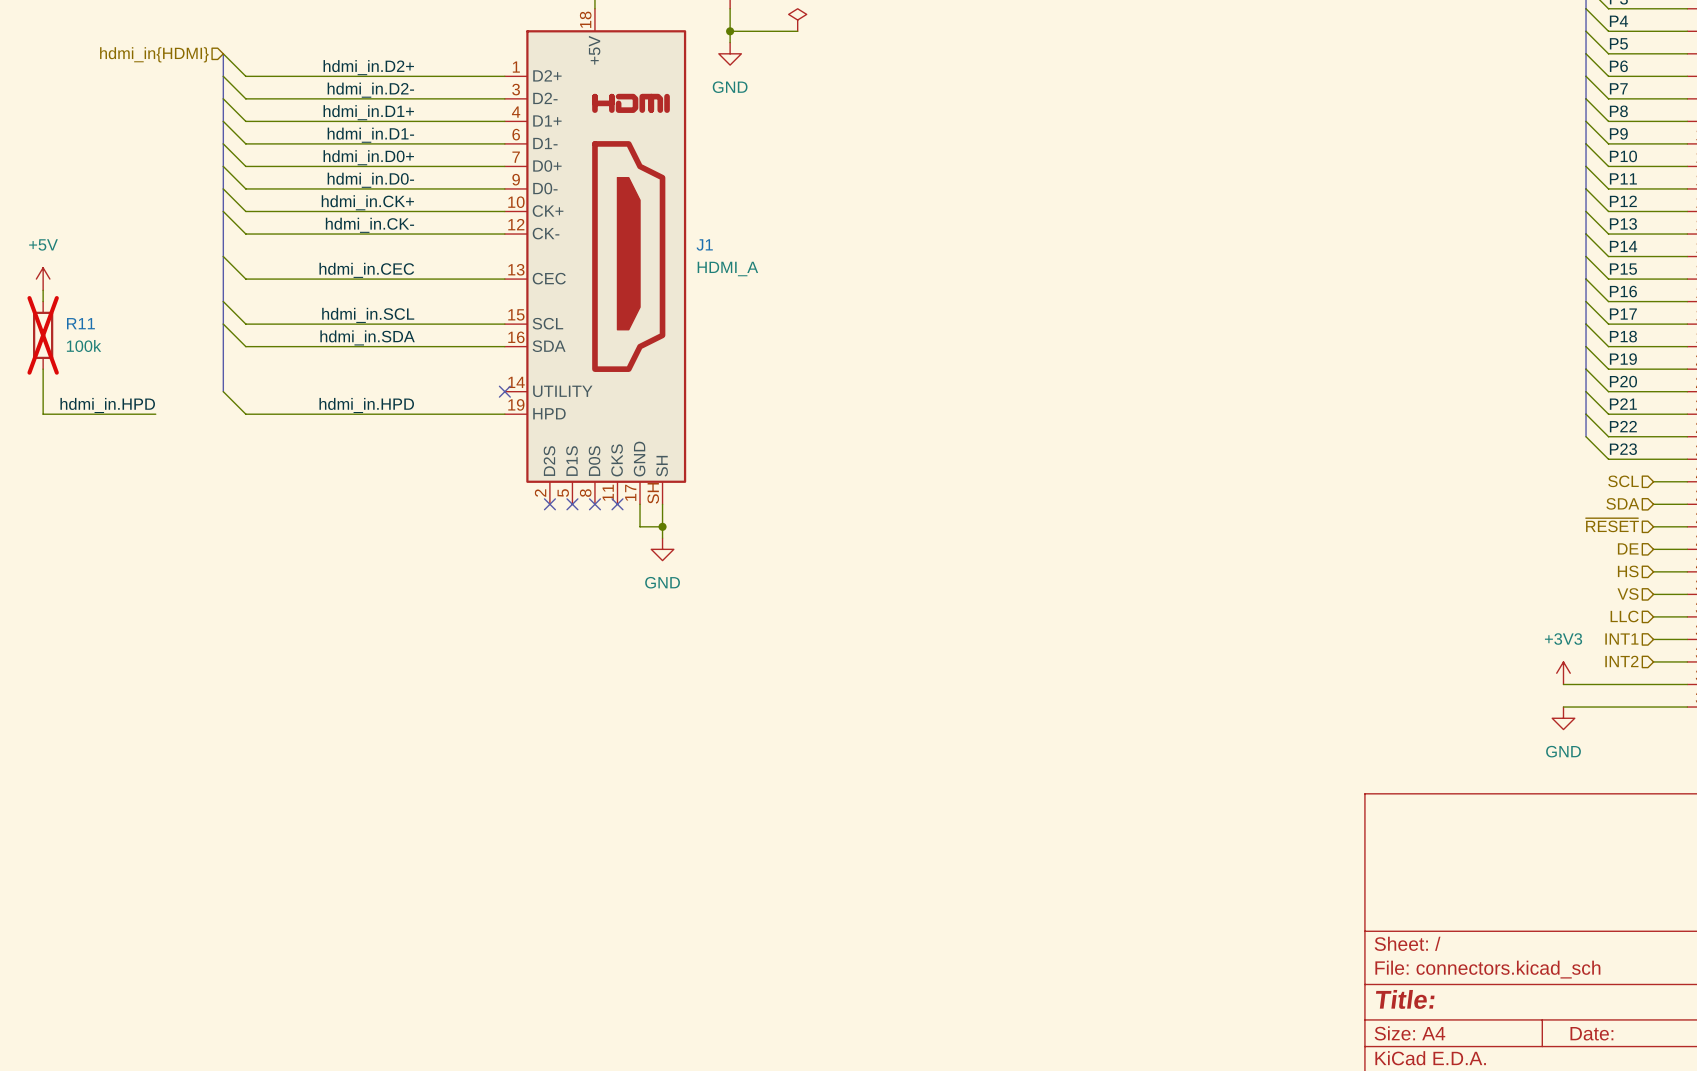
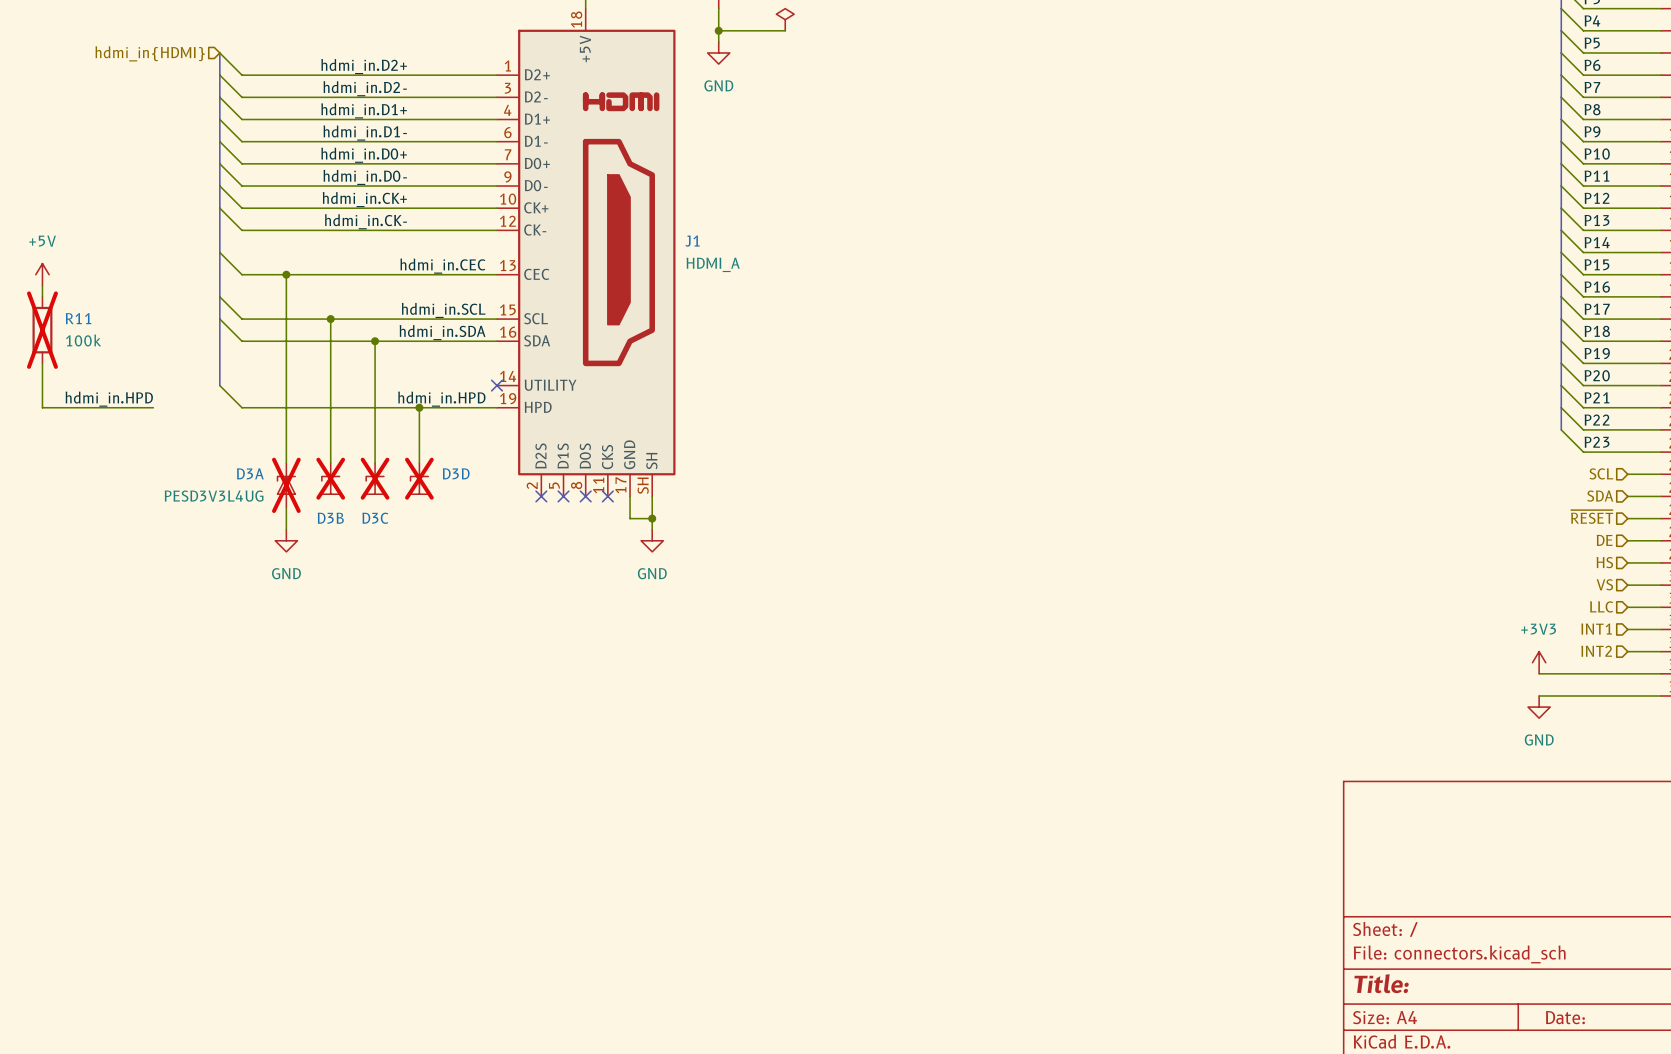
label position: hdmi_in.CEC (366, 270) -> hdmi_in.CEC (442, 266)
wire: none -> (286, 274) (286, 463)
junction: none -> (286, 274)
label position: hdmi_in.SCL (368, 315) -> hdmi_in.SCL (443, 310)
wire: none -> (330, 319) (330, 463)
junction: none -> (330, 319)
label position: hdmi_in.SDA (367, 337) -> hdmi_in.SDA (442, 332)
wire: none -> (375, 341) (375, 463)
junction: none -> (375, 341)
label position: hdmi_in.HPD (366, 405) -> hdmi_in.HPD (441, 399)
wire: none -> (419, 407) (419, 463)
junction: none -> (419, 407)
D3B: none -> (330, 478)
D3C: none -> (375, 478)
D3D: none -> (419, 478)
D3A: none -> PESD3V3L4UG (286, 485)
wire: none -> (286, 507) (286, 529)
power symbol: none -> GND (286, 540)

